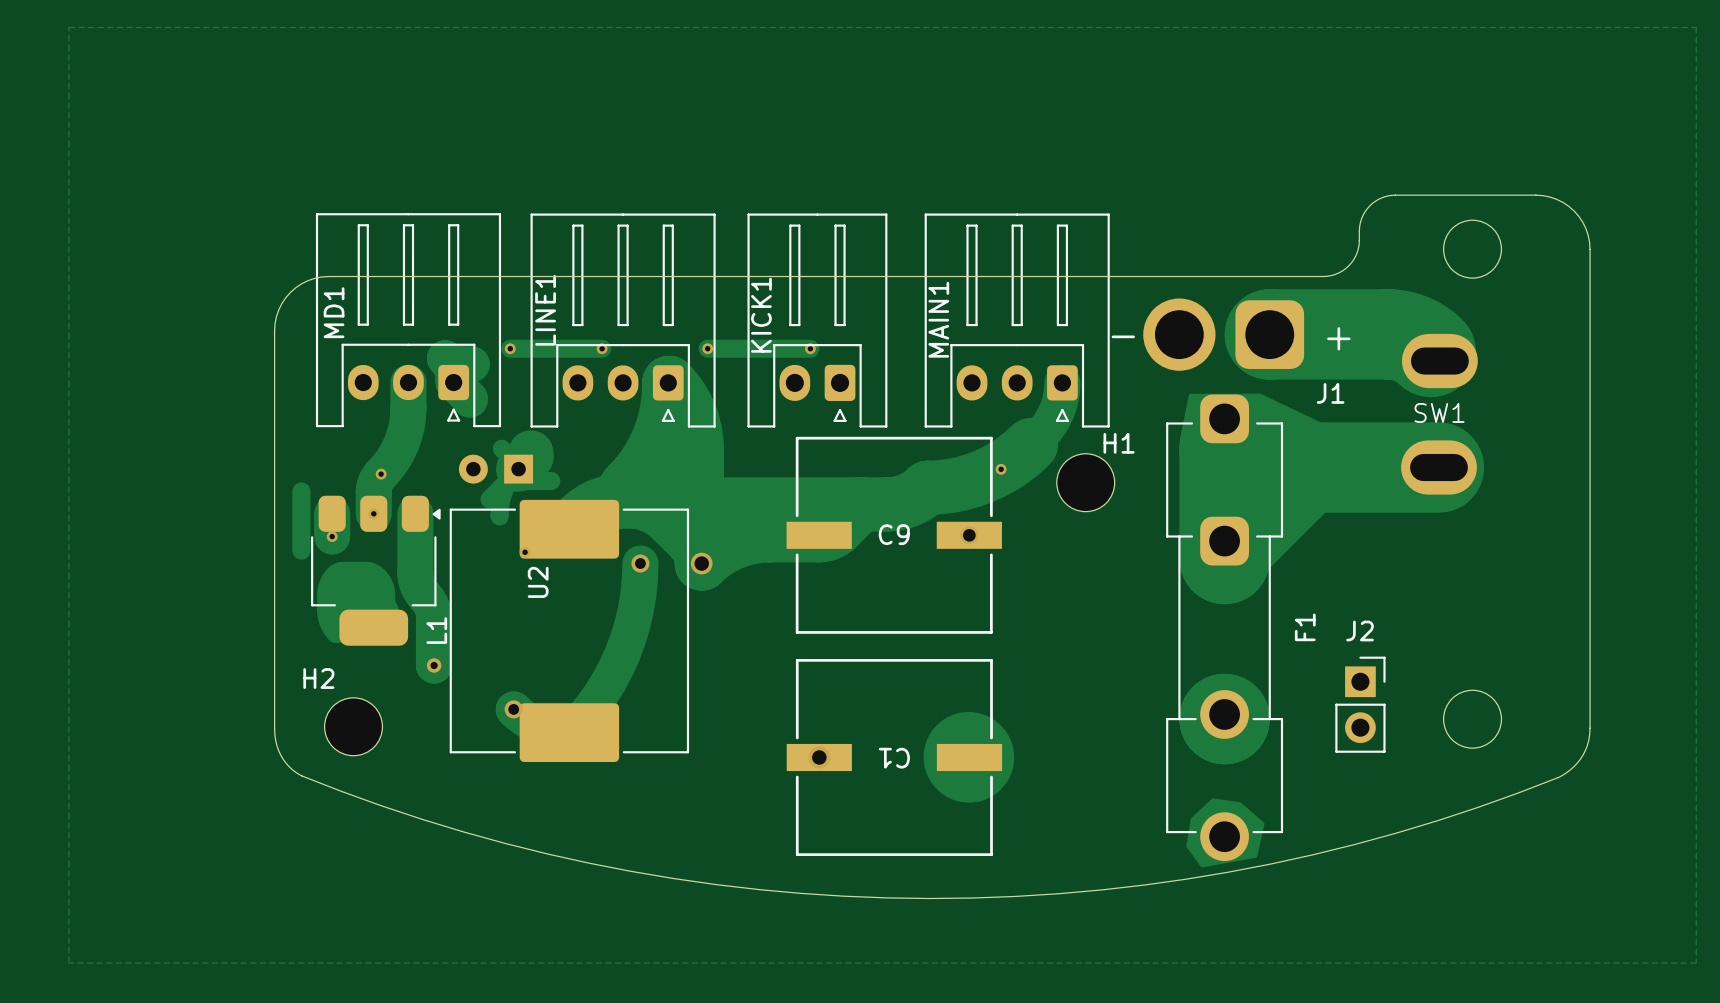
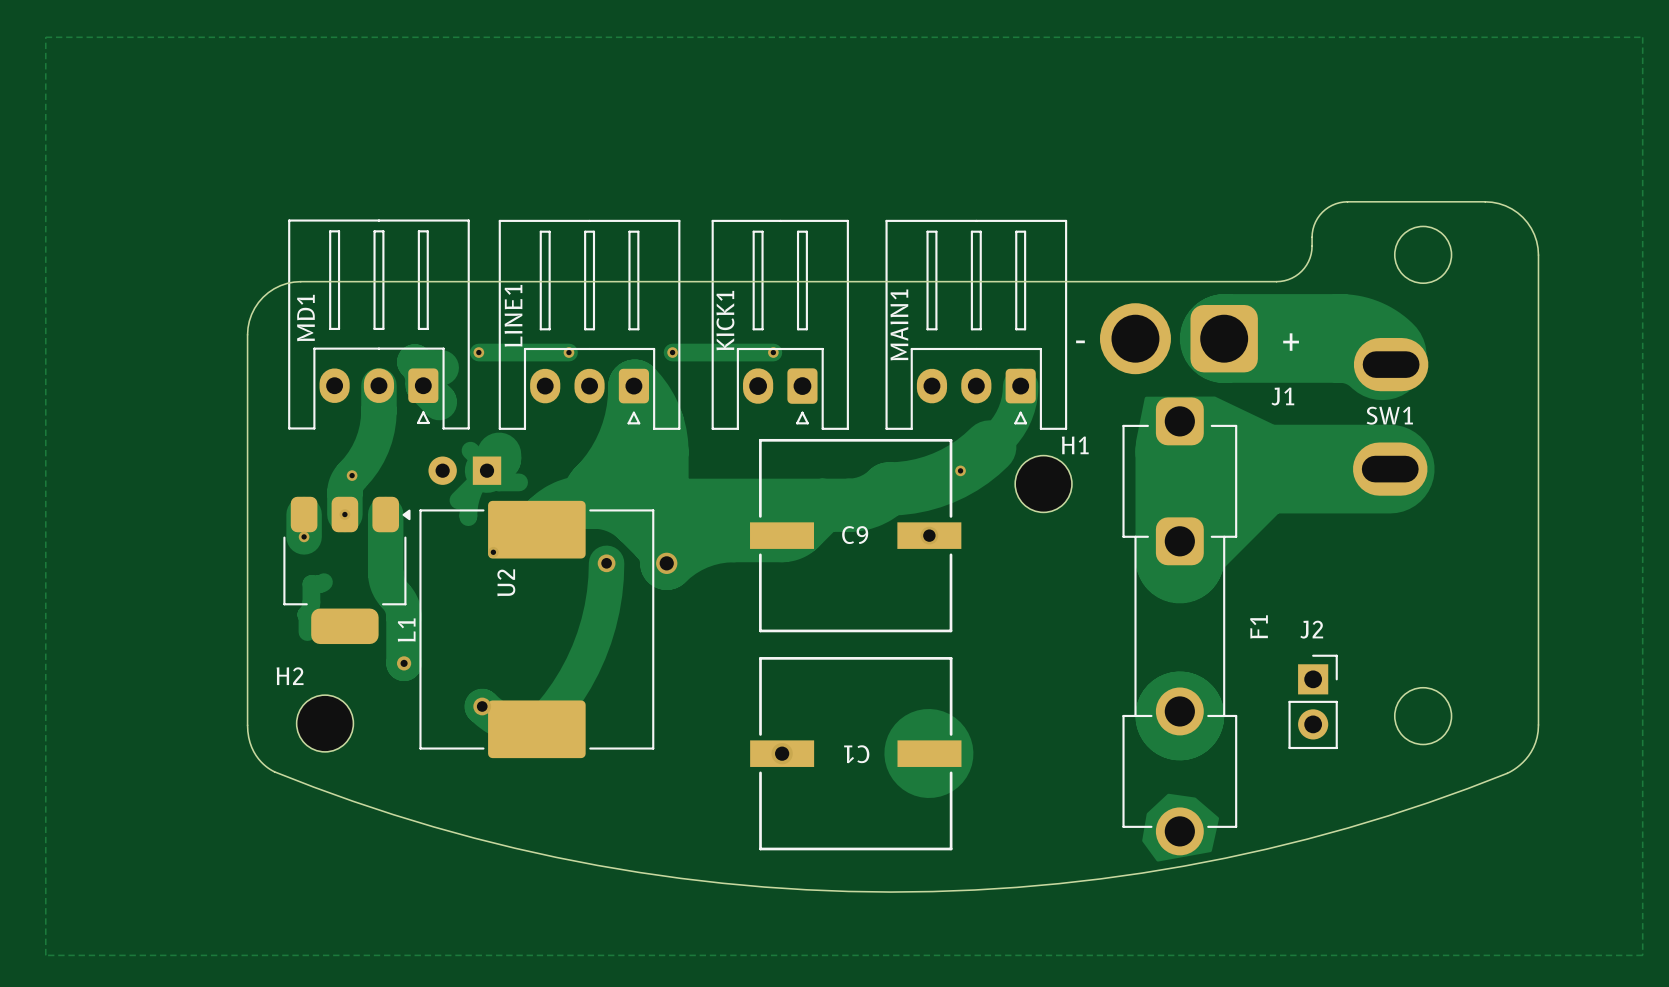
track: (301, 491) (301, 550) -> none
track: (365, 584) (374, 596) (375, 607) (347, 607) (343, 609) (343, 598) (357, 596) -> none
track: (389, 609) (386, 603) (384, 585) (374, 573) (367, 570) (341, 570) (332, 576) (326, 589) (326, 610) (327, 619) (332, 630) (335, 633) (362, 633) (373, 627) -> none

